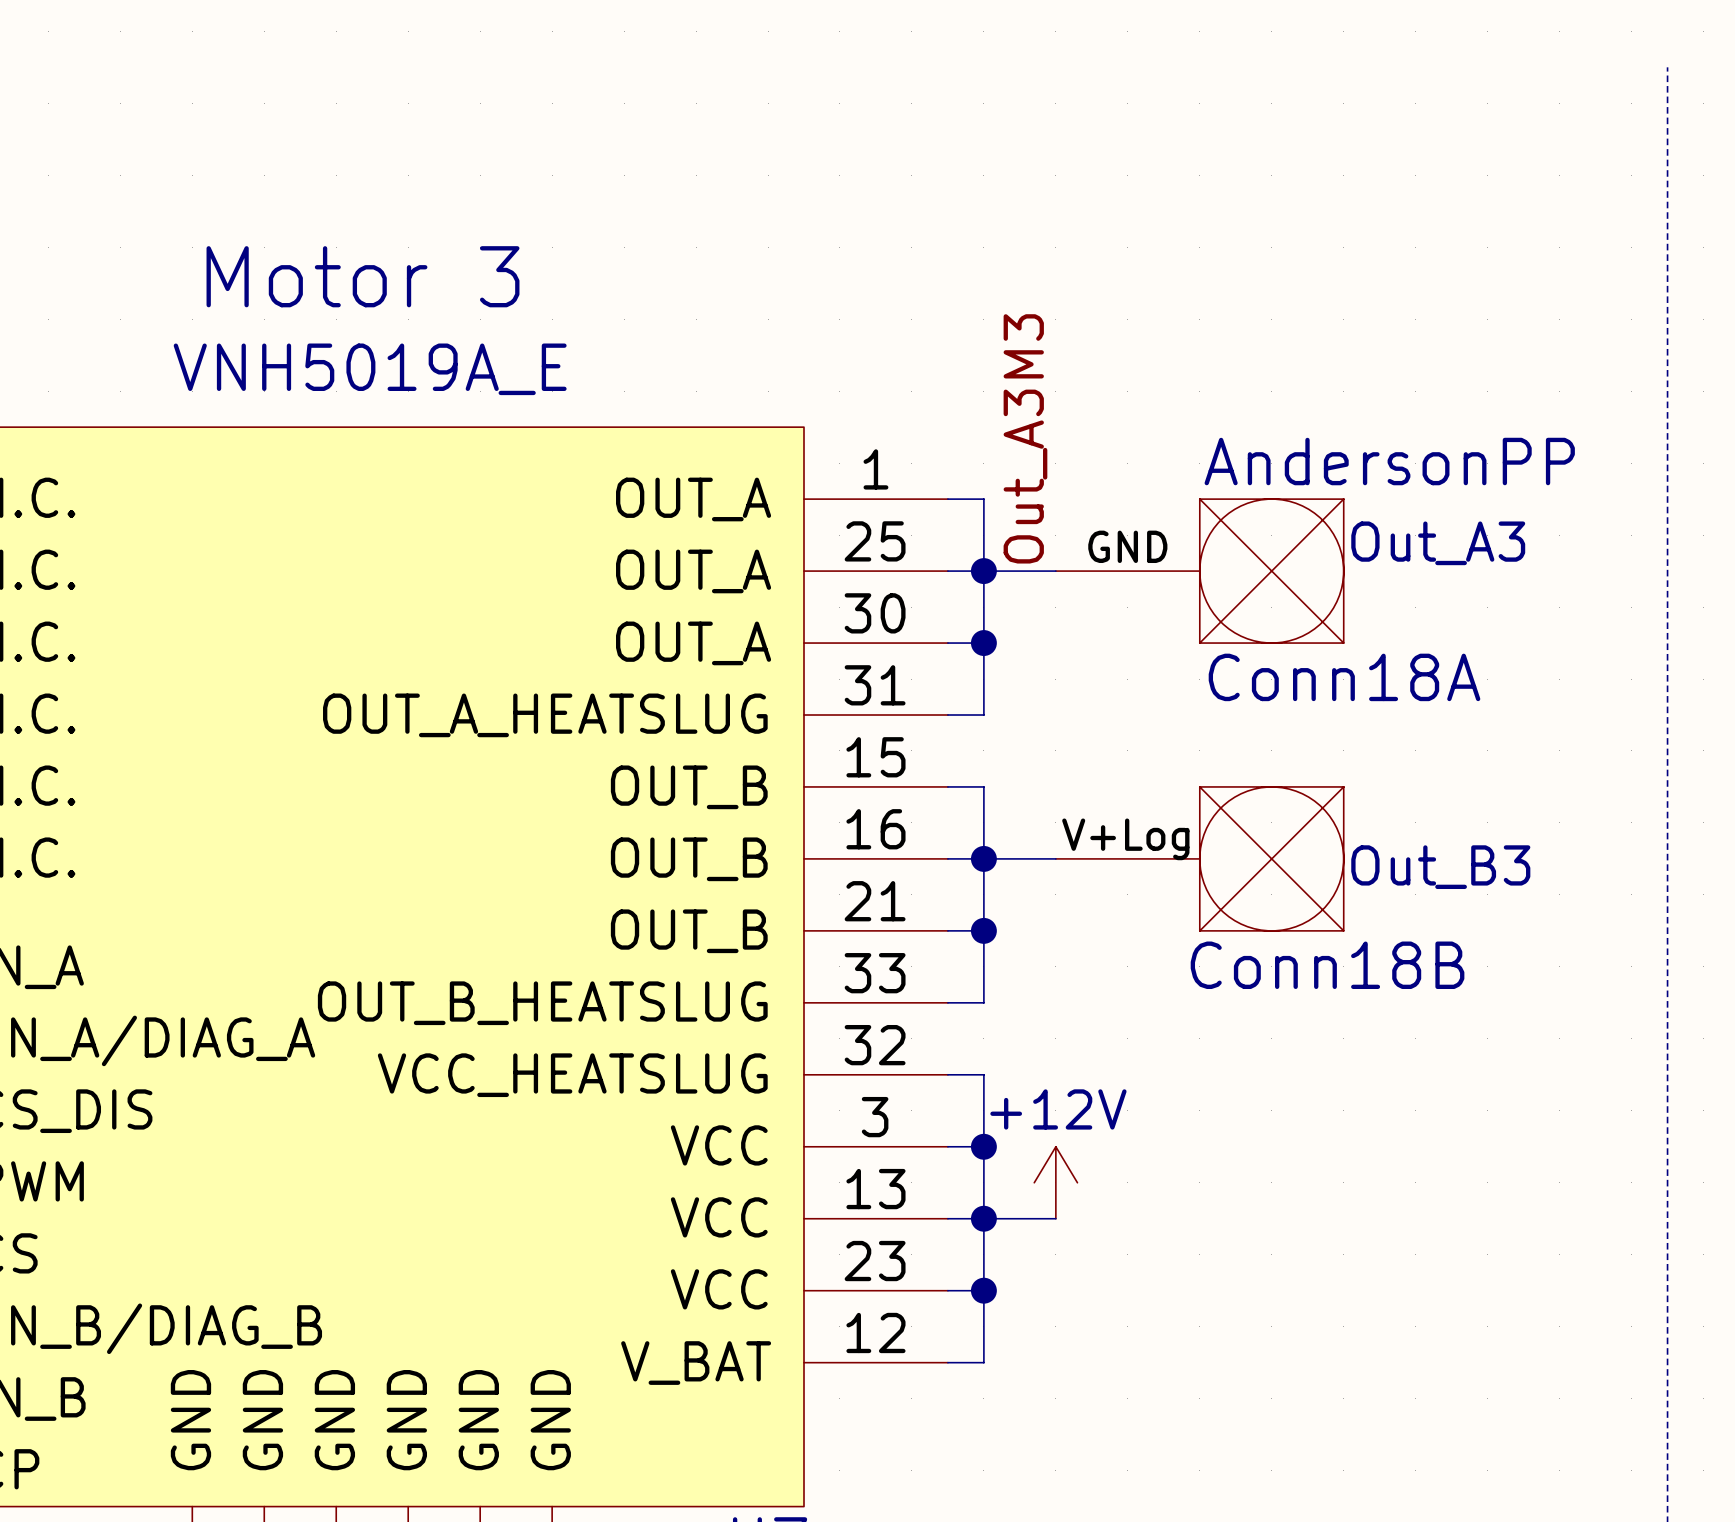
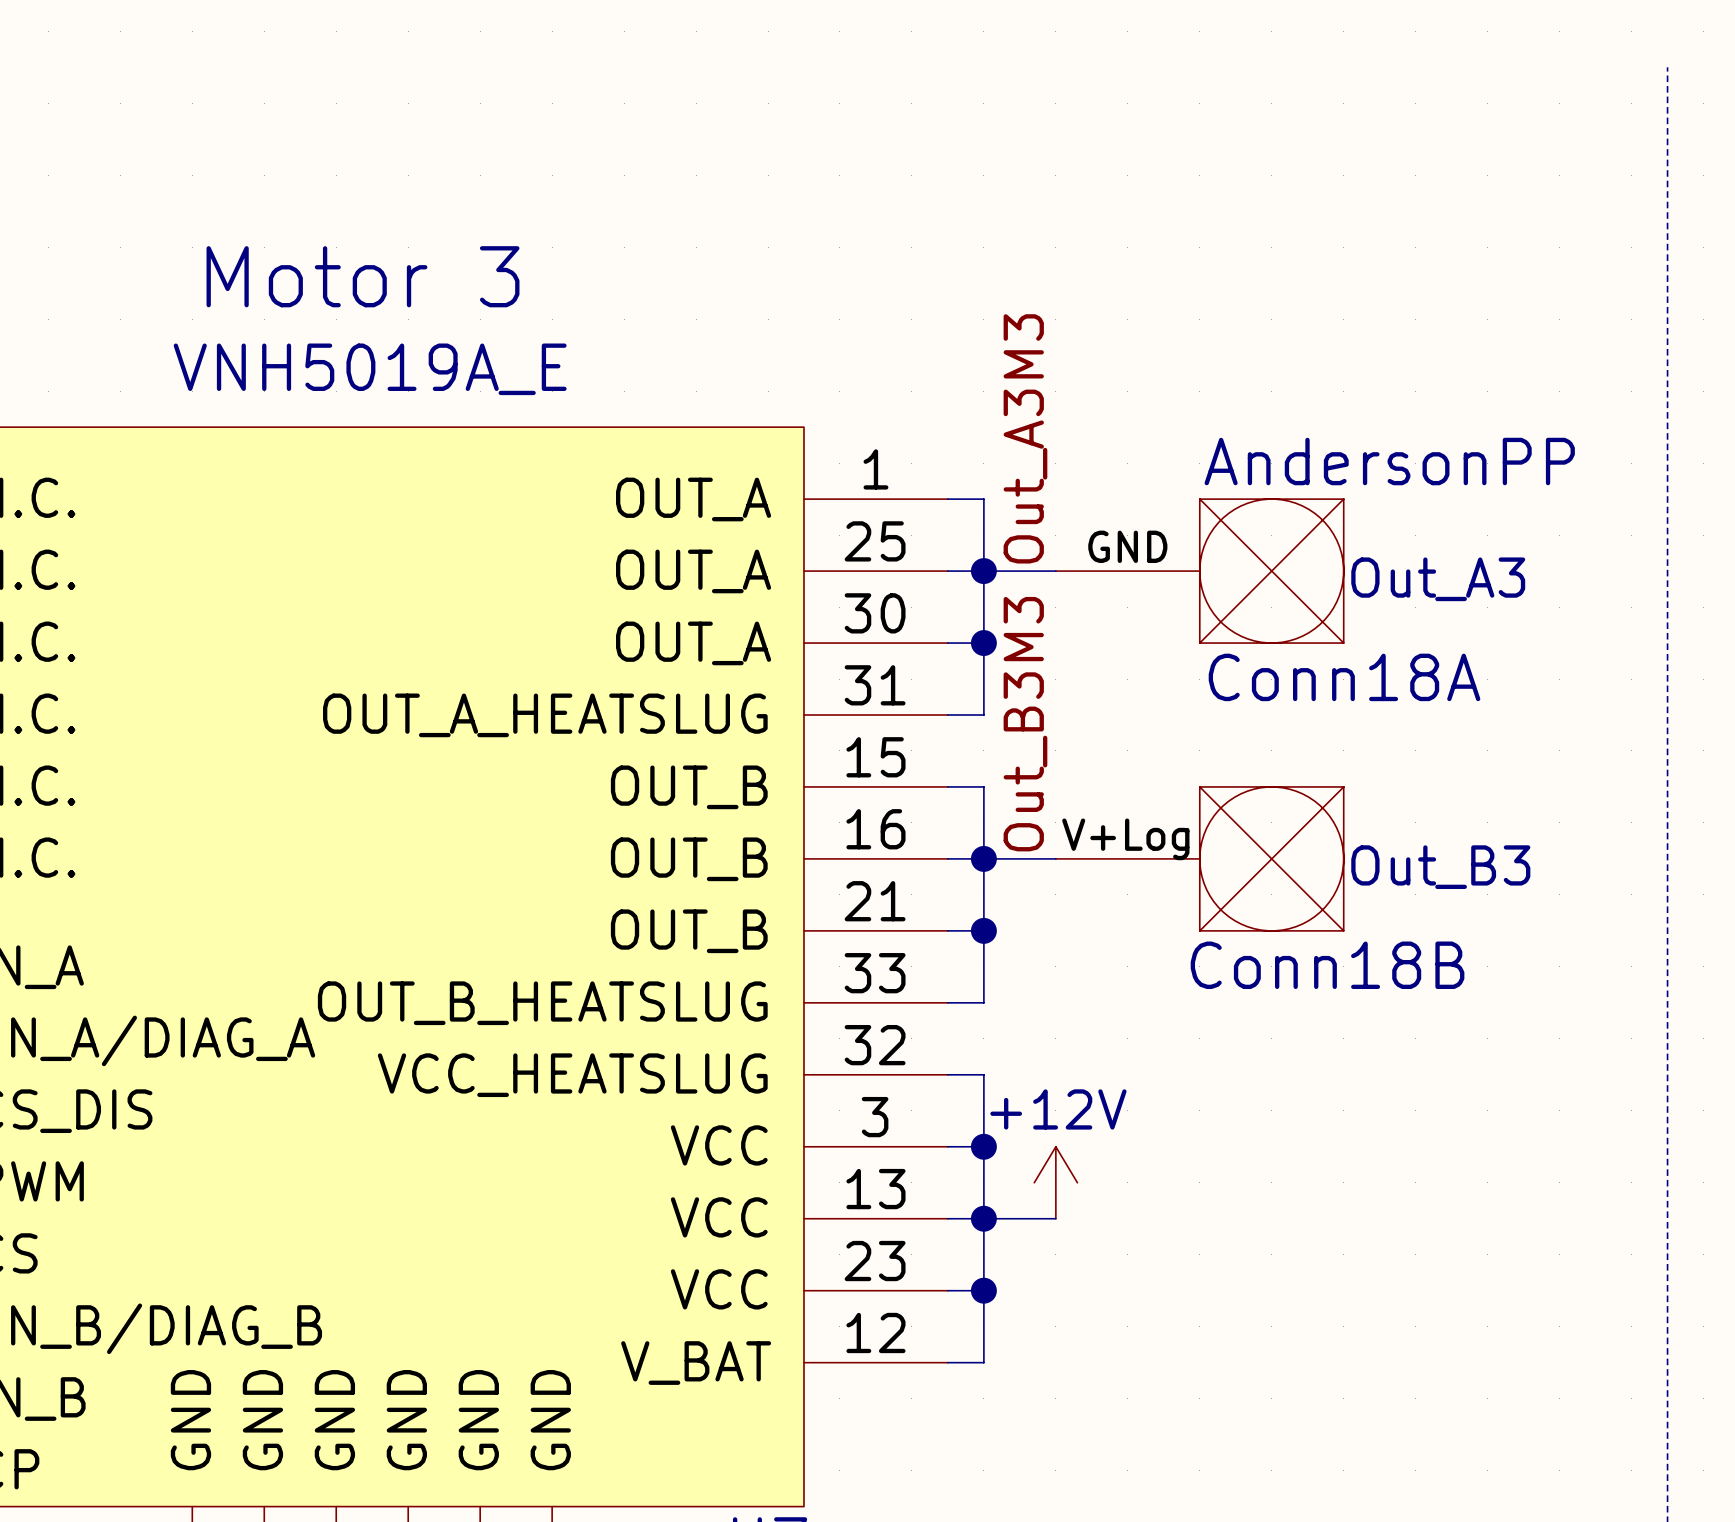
text position: Out_A3 (1438, 543) -> Out_A3 (1438, 579)
label: none -> Out_B3M3 (1025, 724)

